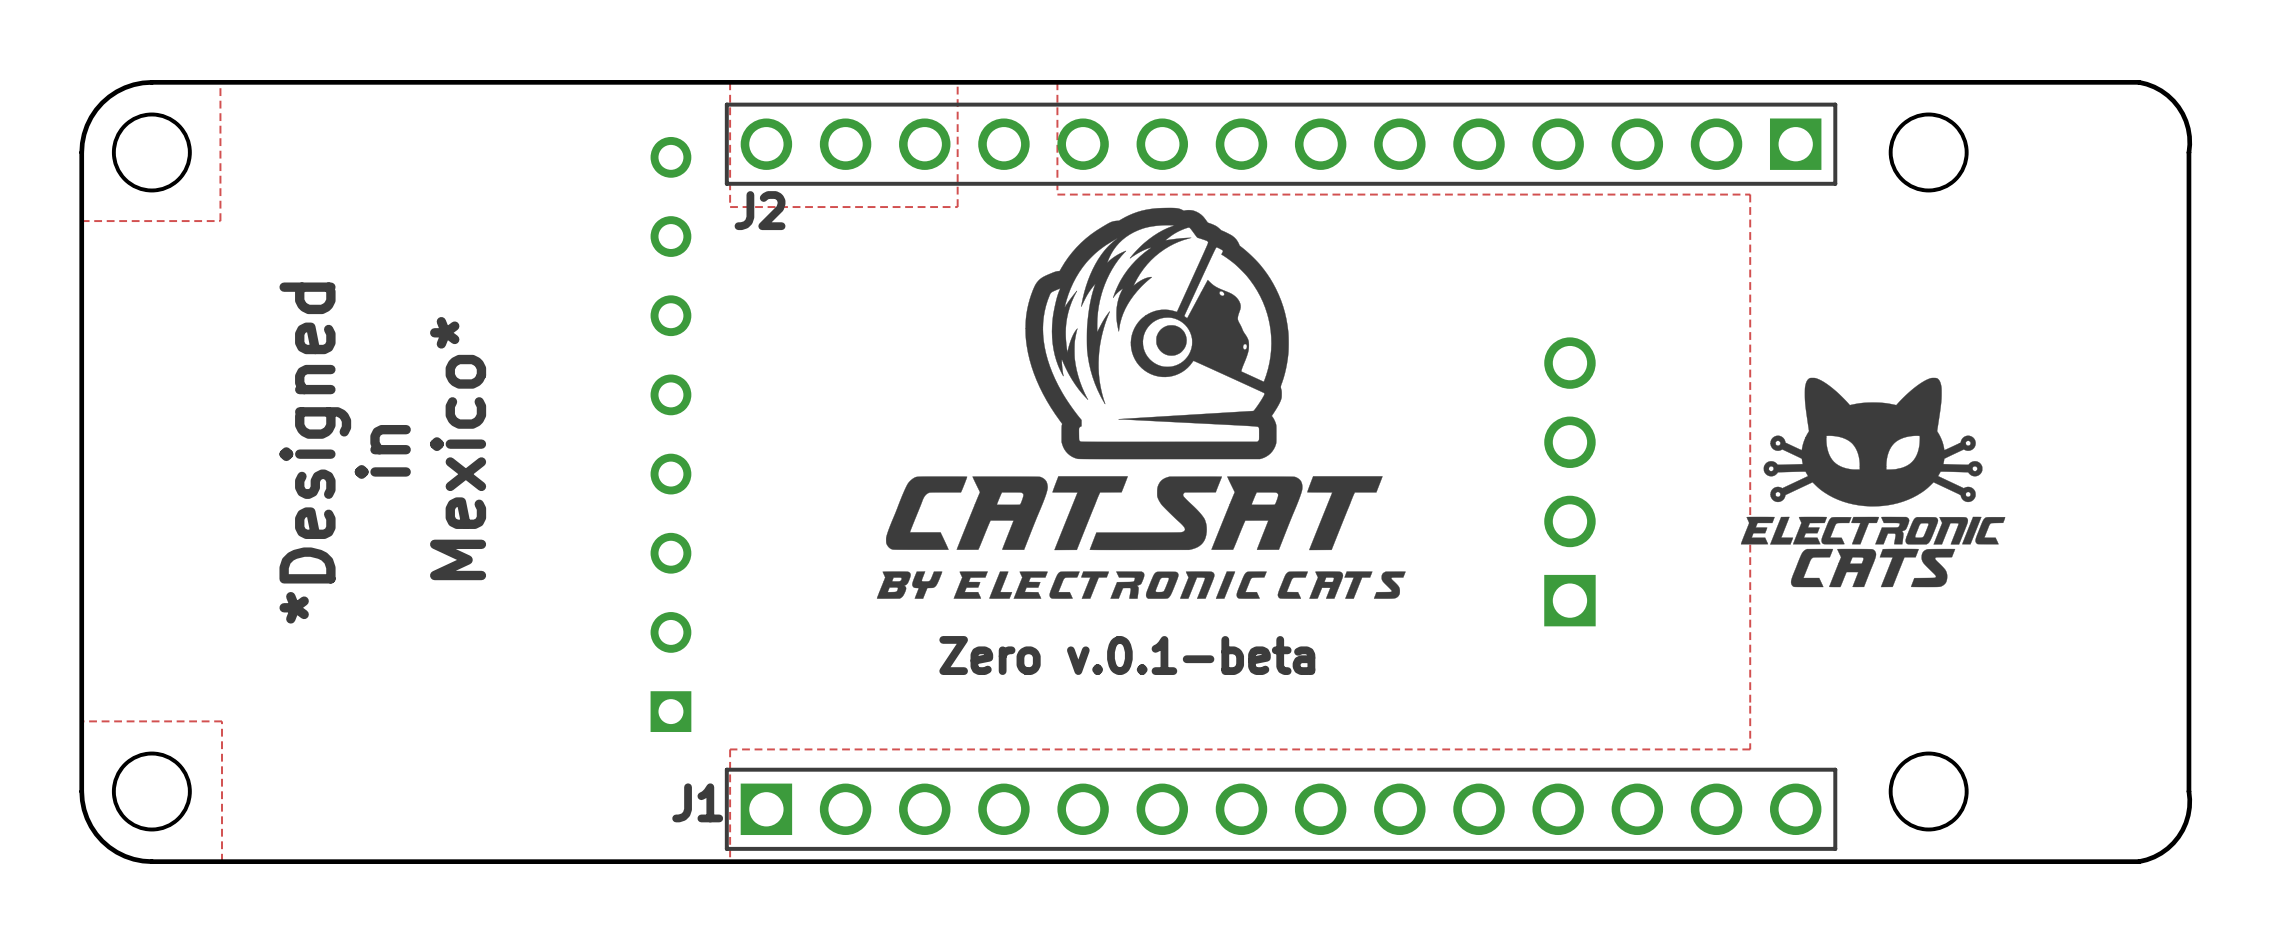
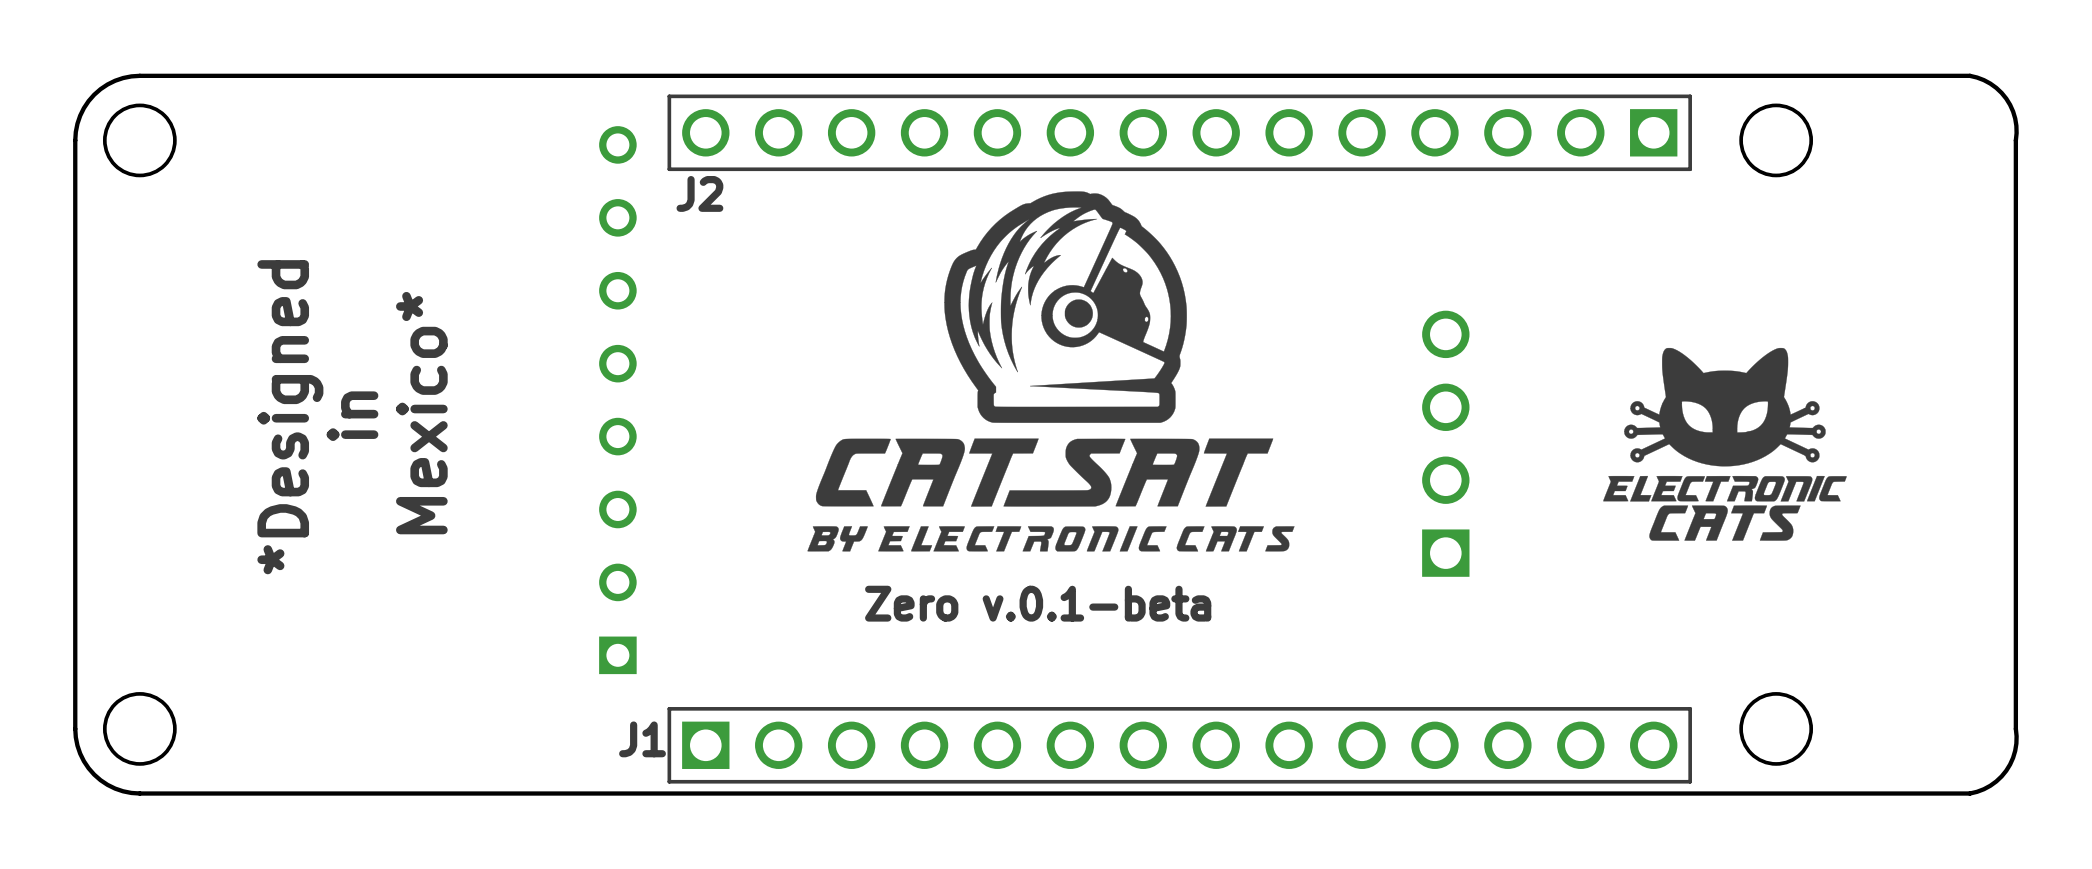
zone outline: (220, 82) (220, 221) (81, 221) (81, 721) (222, 721) (222, 861) (730, 861) (730, 749) (1750, 749) (1750, 194) (1057, 194) (1057, 82) (957, 82) (957, 207) (730, 207) (730, 82) (220, 82) -> none

